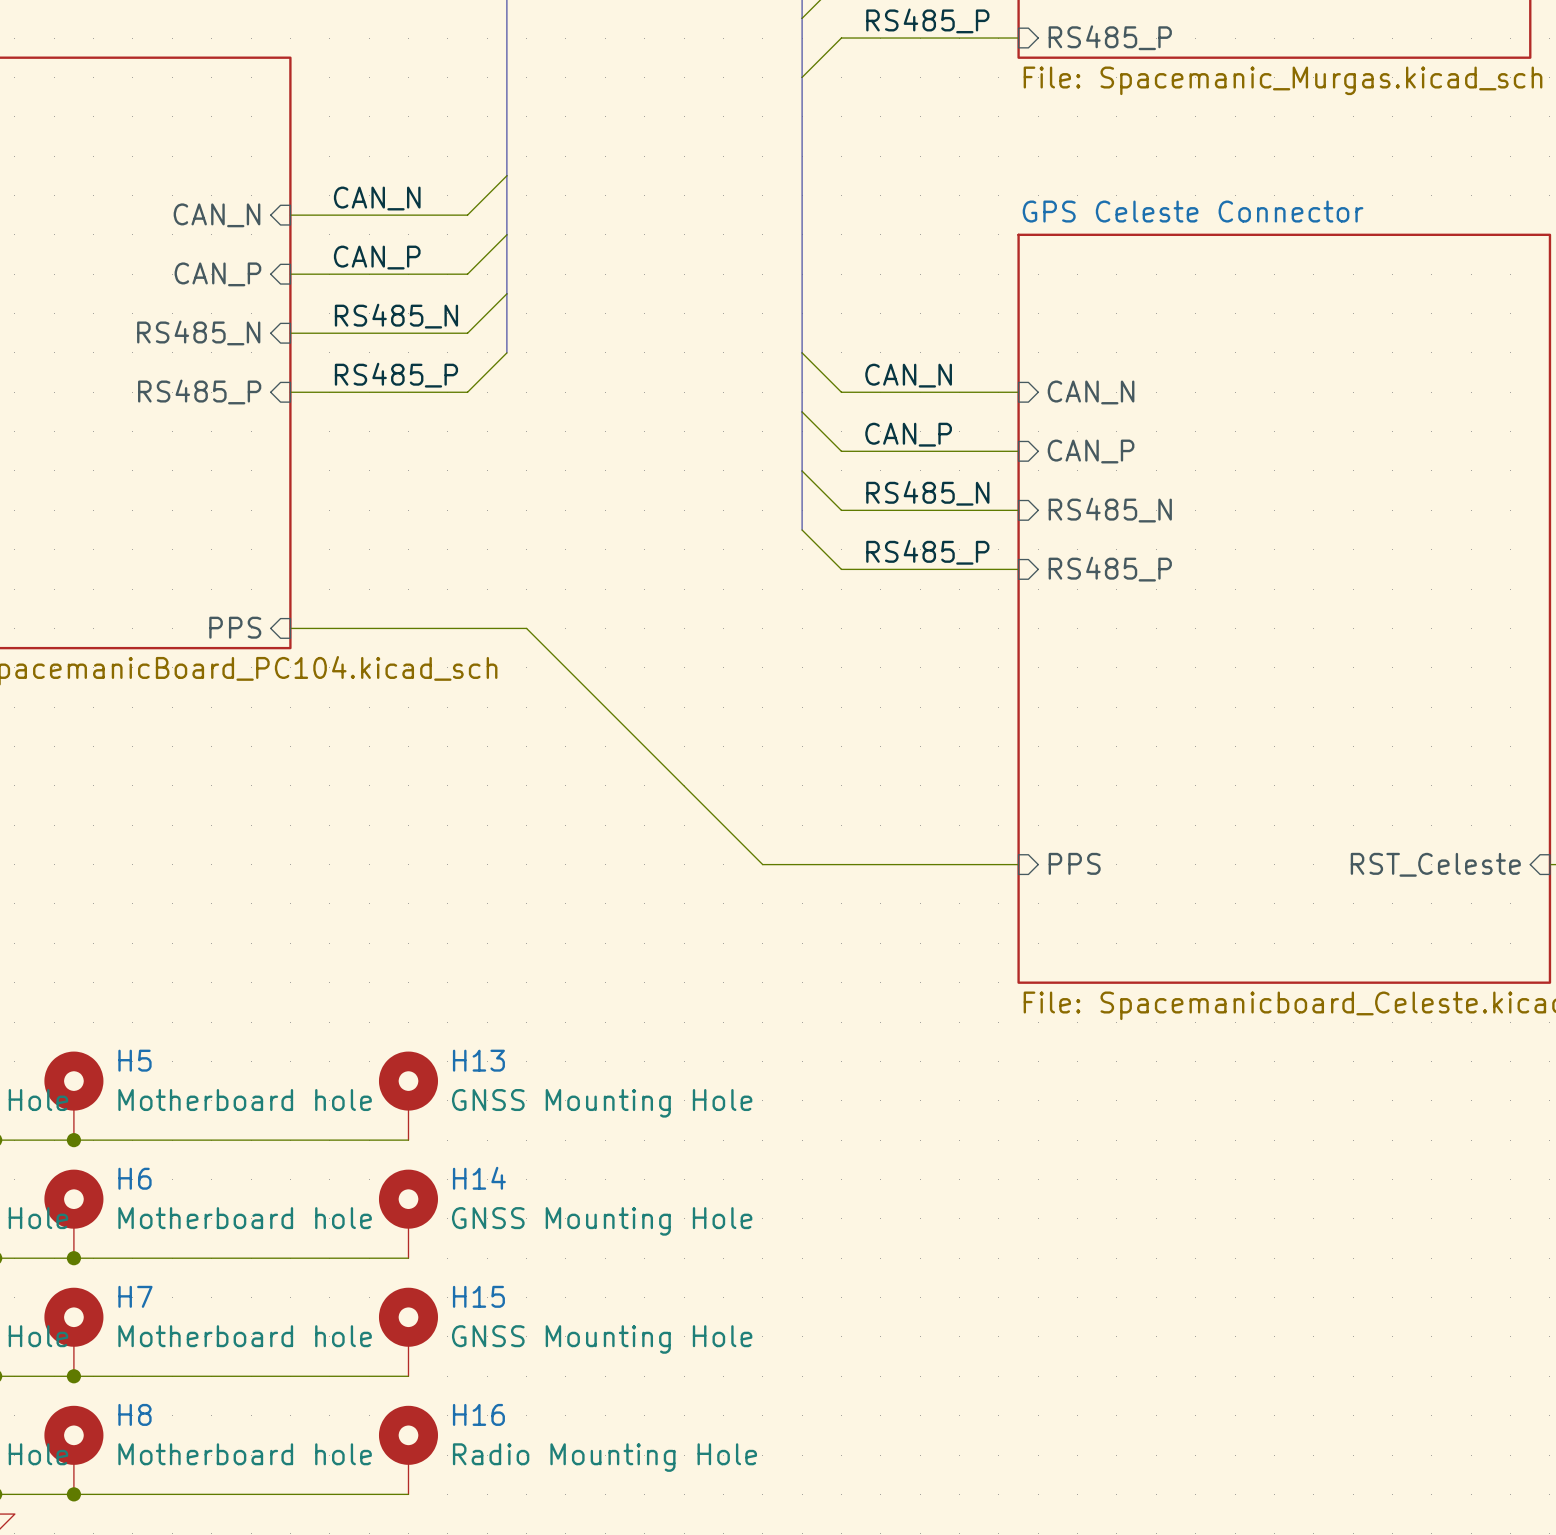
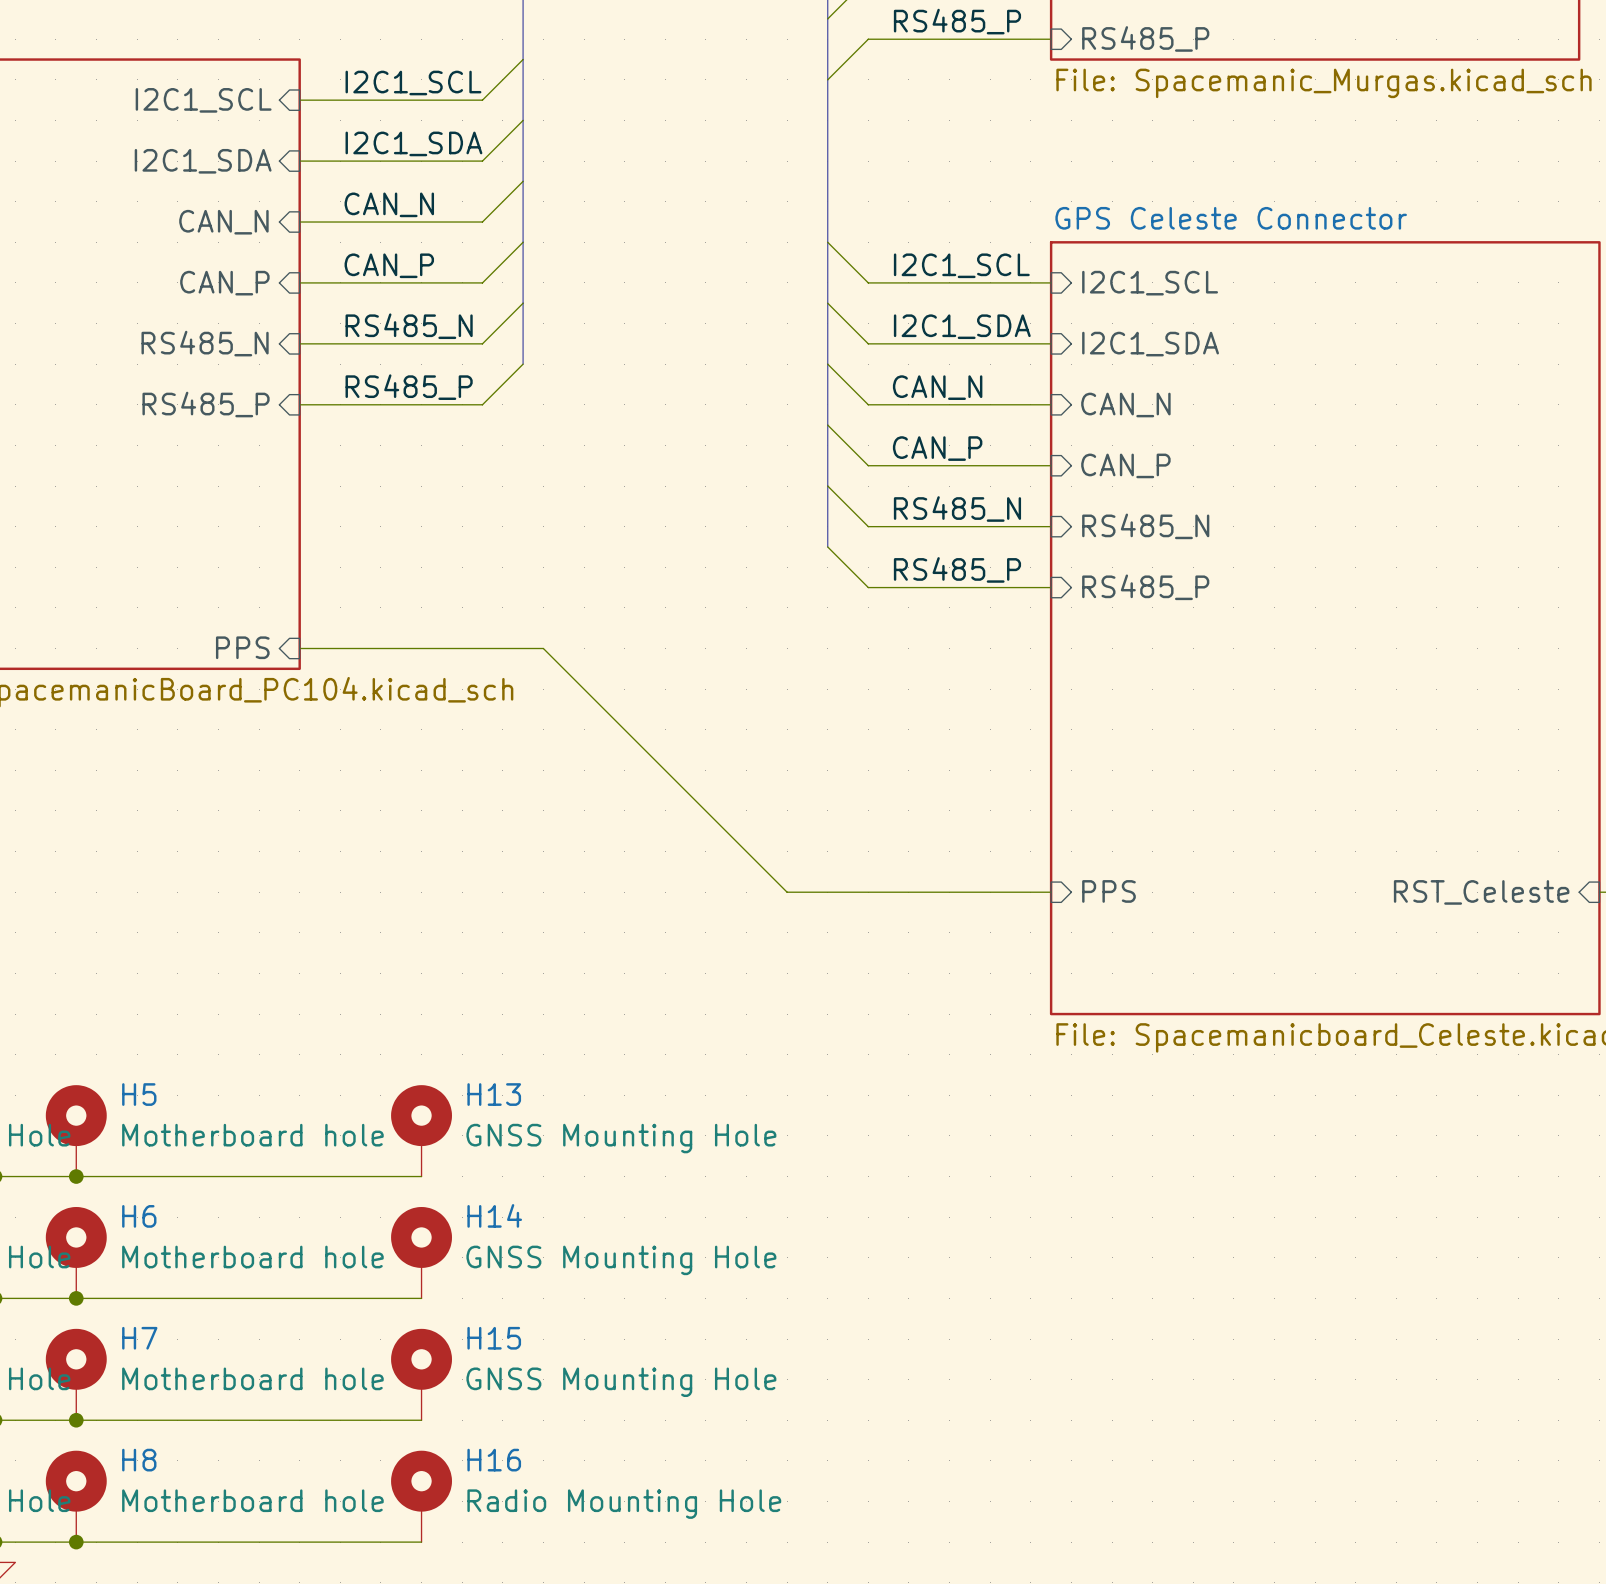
wire: none -> (523, 59) (482, 100) (299, 100)
label: none -> I2C1_SCL (413, 83)
sheet pin: none -> I2C1_SCL (203, 100)
wire: none -> (523, 120) (482, 161) (299, 161)
label: none -> I2C1_SDA (413, 143)
sheet pin: none -> I2C1_SDA (203, 161)
wire: none -> (827, 242) (868, 282) (1051, 282)
label: none -> I2C1_SCL (961, 265)
sheet pin: none -> I2C1_SCL (1150, 283)
wire: none -> (827, 303) (868, 343) (1051, 343)
label: none -> I2C1_SDA (962, 326)
sheet pin: none -> I2C1_SDA (1150, 344)

